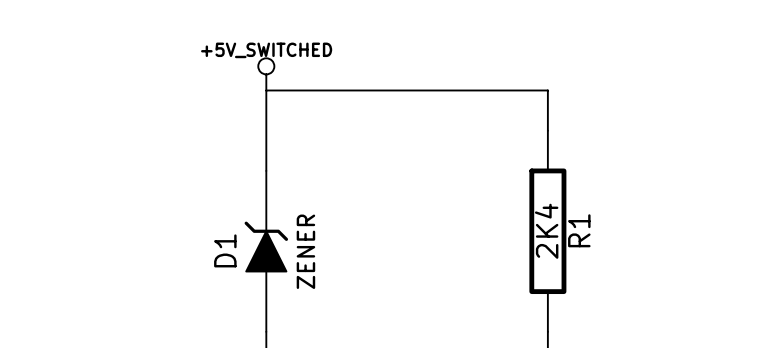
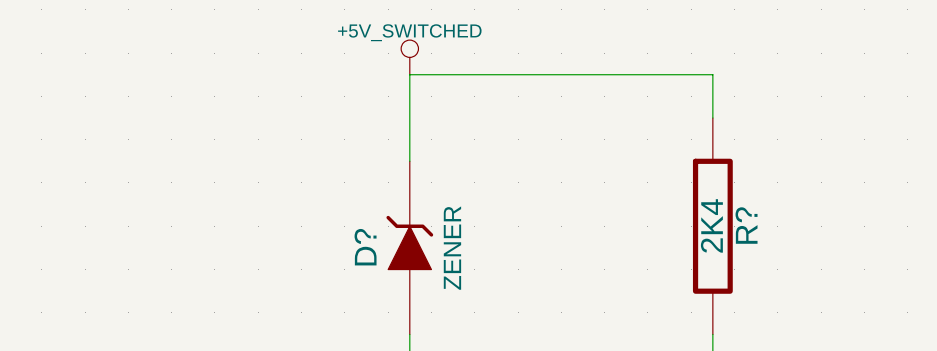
R1 name: R1 (579, 230) -> R? (746, 225)
D1 name: D1 (225, 250) -> D? (365, 247)

